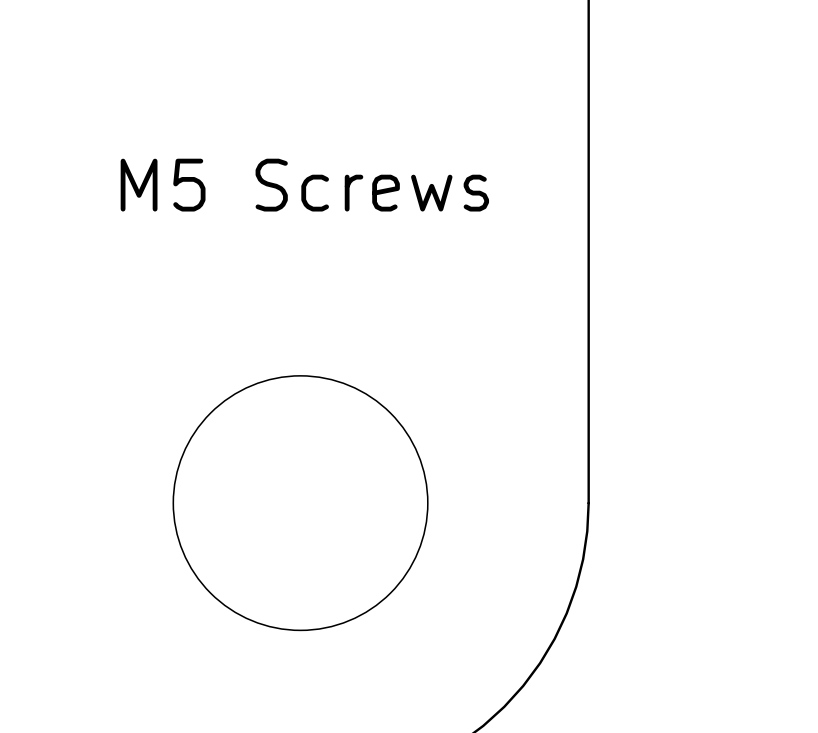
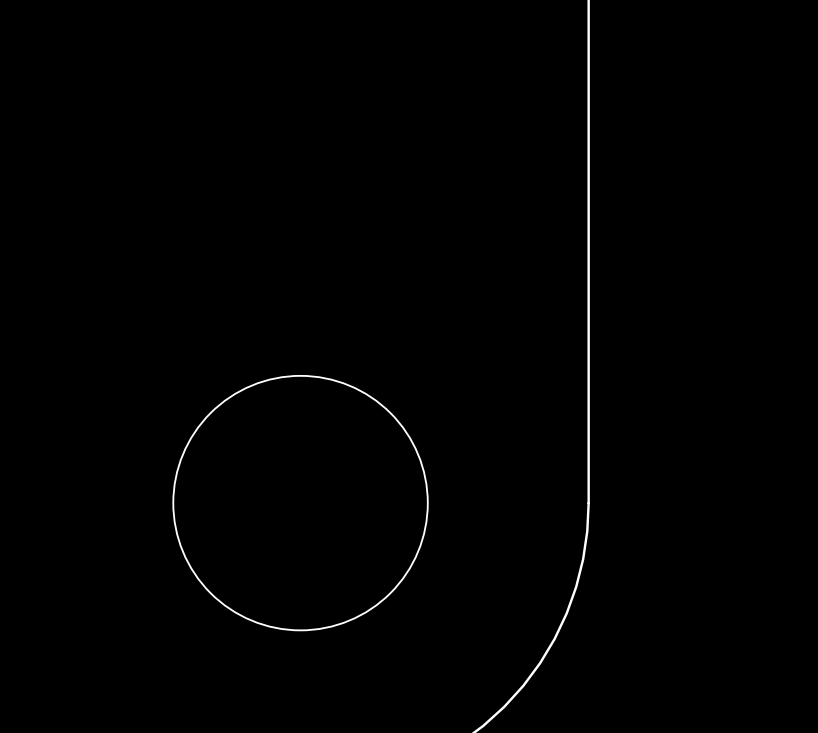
text: M5 Screws (304, 185) -> none

